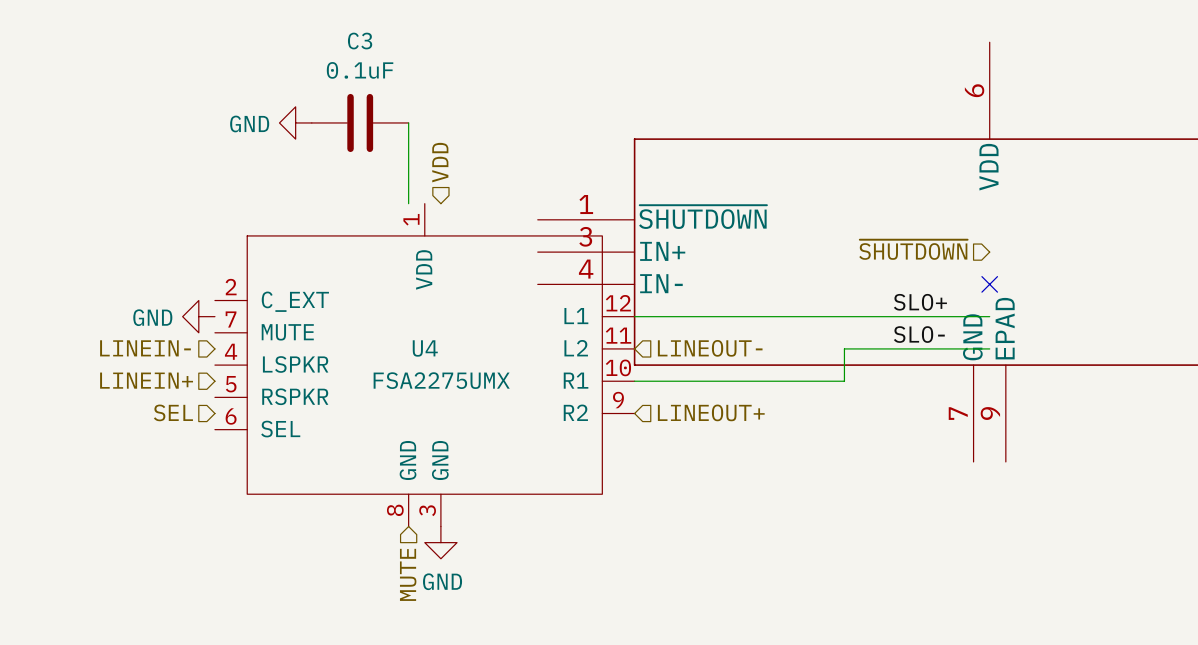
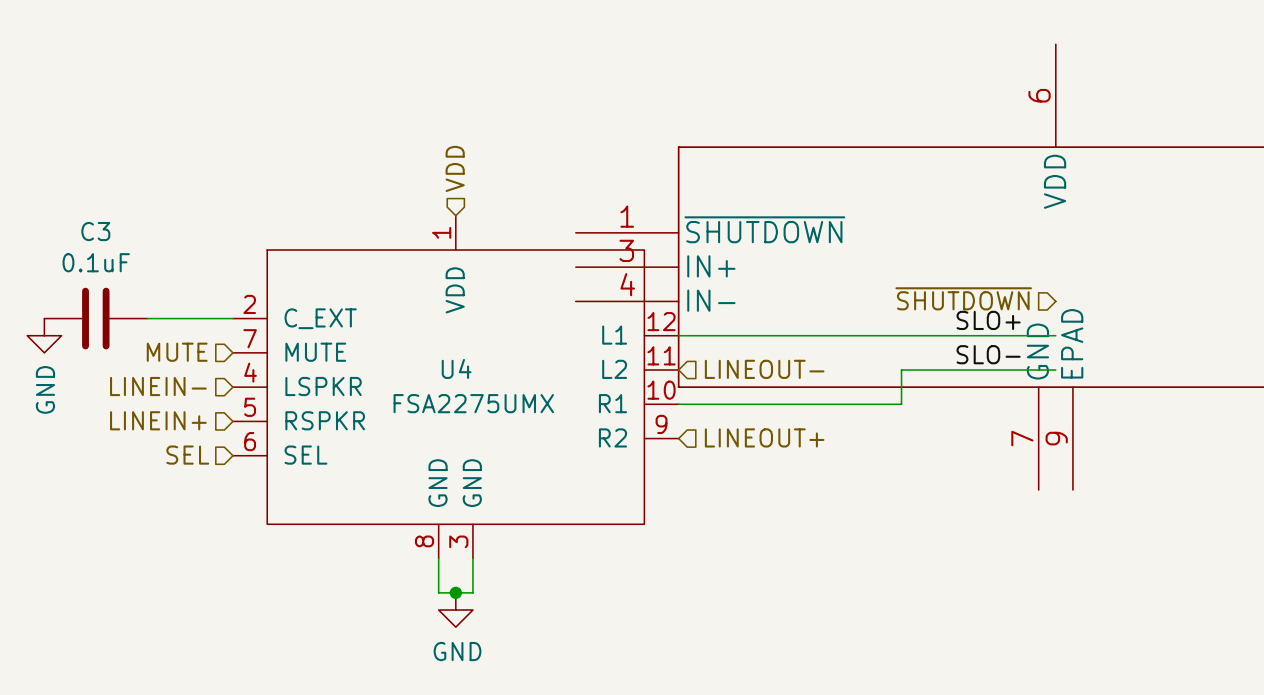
power symbol: GND (295, 122) -> none
C3 position: (360, 122) -> (95, 318)
wire: (408, 122) (408, 203) -> none
hierarchical label position: VDD (440, 162) -> VDD (455, 168)
hierarchical label position: ~{SHUTDOWN} (913, 249) -> ~{SHUTDOWN} (963, 298)
no-connect mark: (989, 284) -> none
wire: none -> (147, 318) (232, 318)
power symbol: none -> GND (44, 335)
power symbol: GND (198, 316) -> none
hierarchical label position: LINEIN- (145, 348) -> LINEIN- (158, 386)
hierarchical label position: LINEIN+ (146, 380) -> LINEIN+ (158, 420)
hierarchical label position: SEL (173, 412) -> SEL (187, 455)
wire: none -> (438, 558) (438, 592) (472, 592) (472, 558)
power symbol position: GND (440, 542) -> GND (455, 610)
junction: none -> (455, 592)
hierarchical label rotation: 0° (408, 574) -> 90° clockwise (177, 352)
hierarchical label position: MUTE (408, 574) -> MUTE (177, 352)

